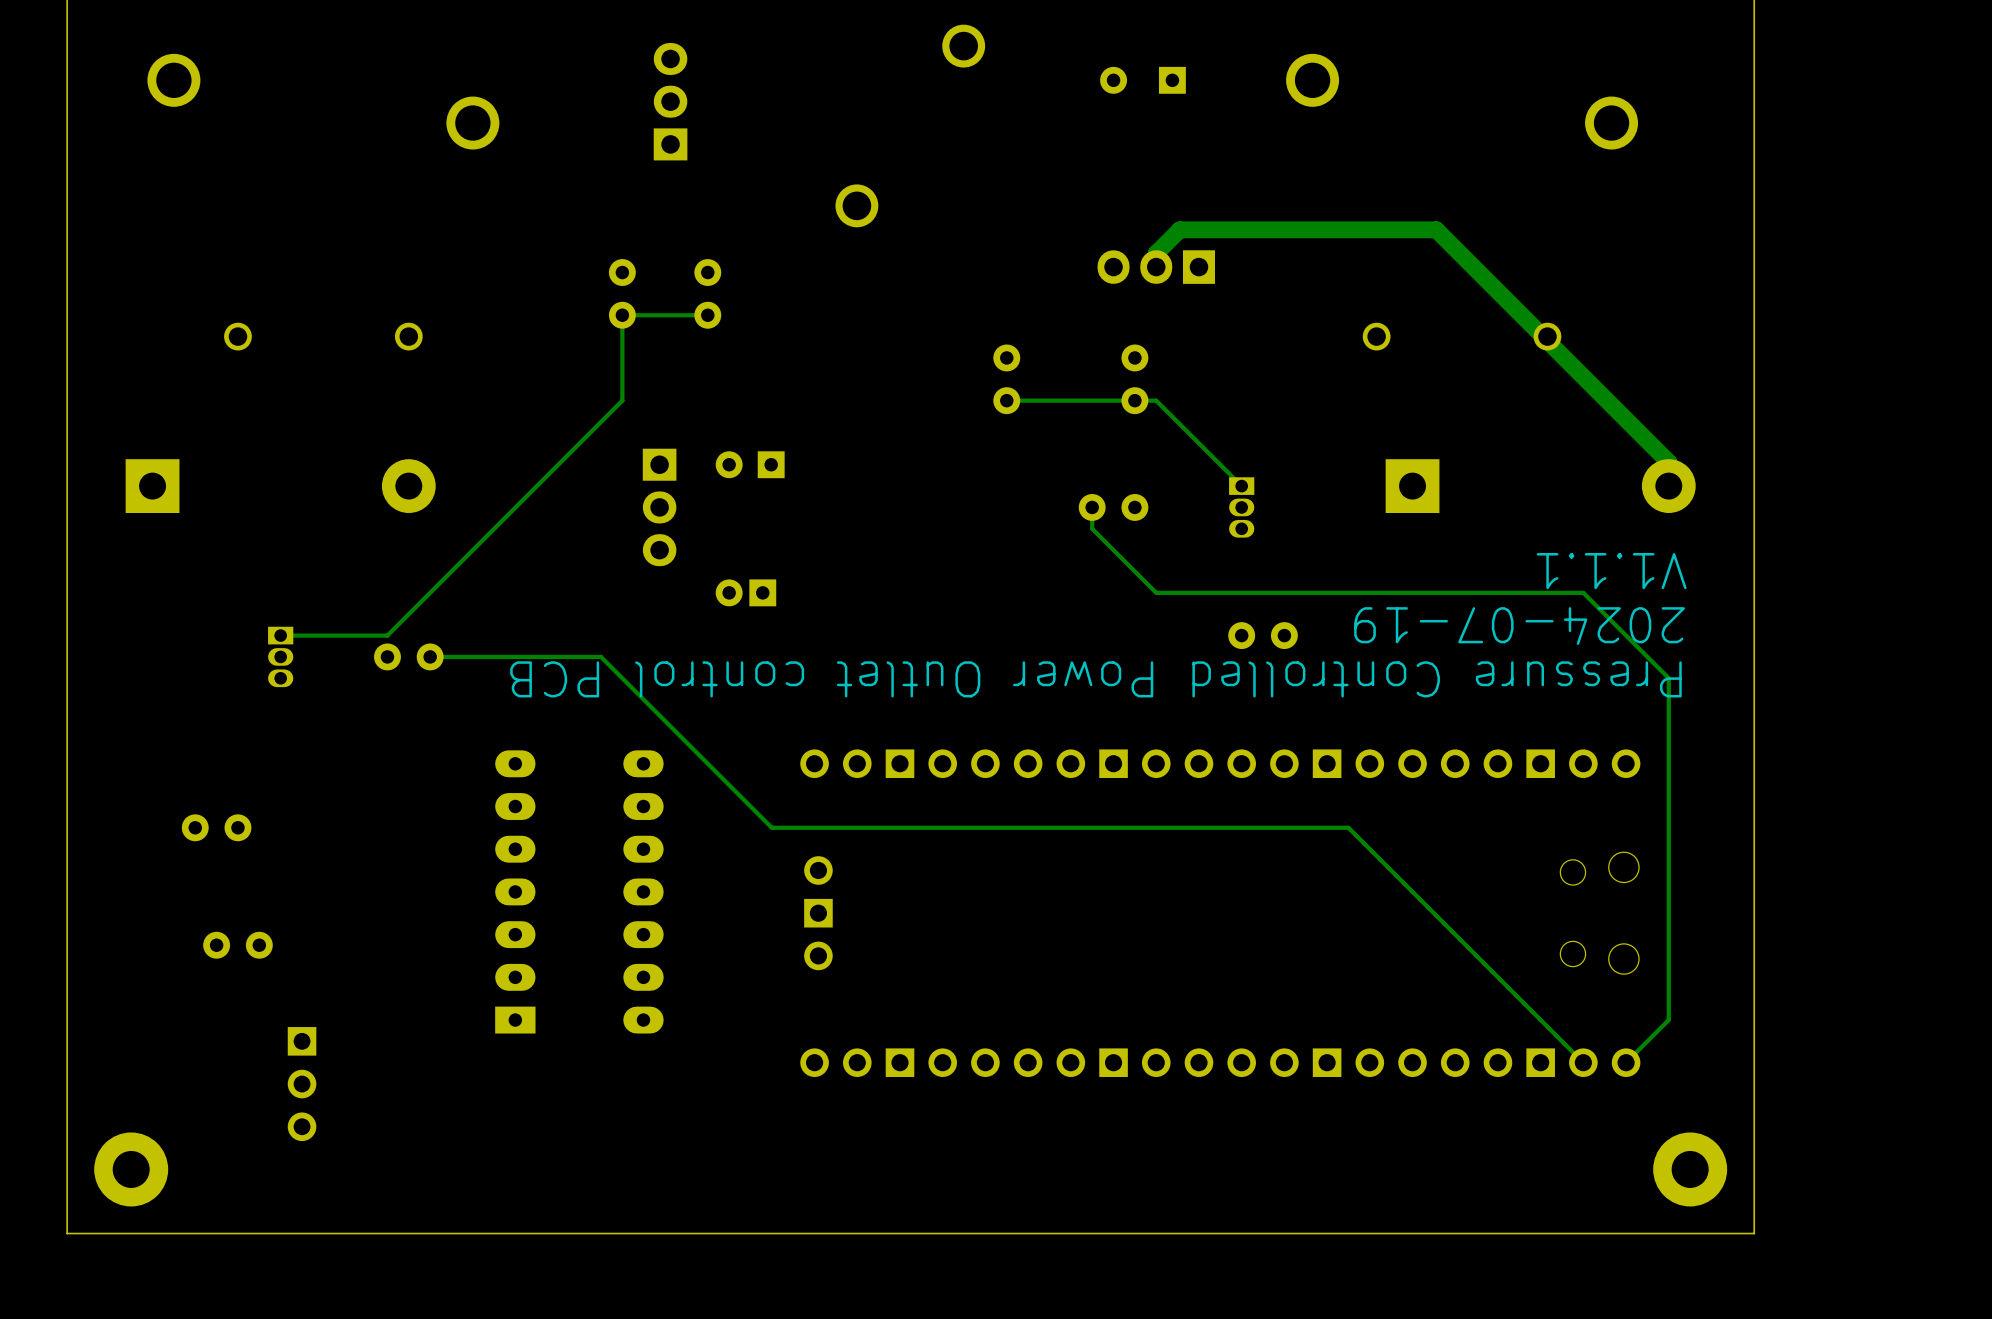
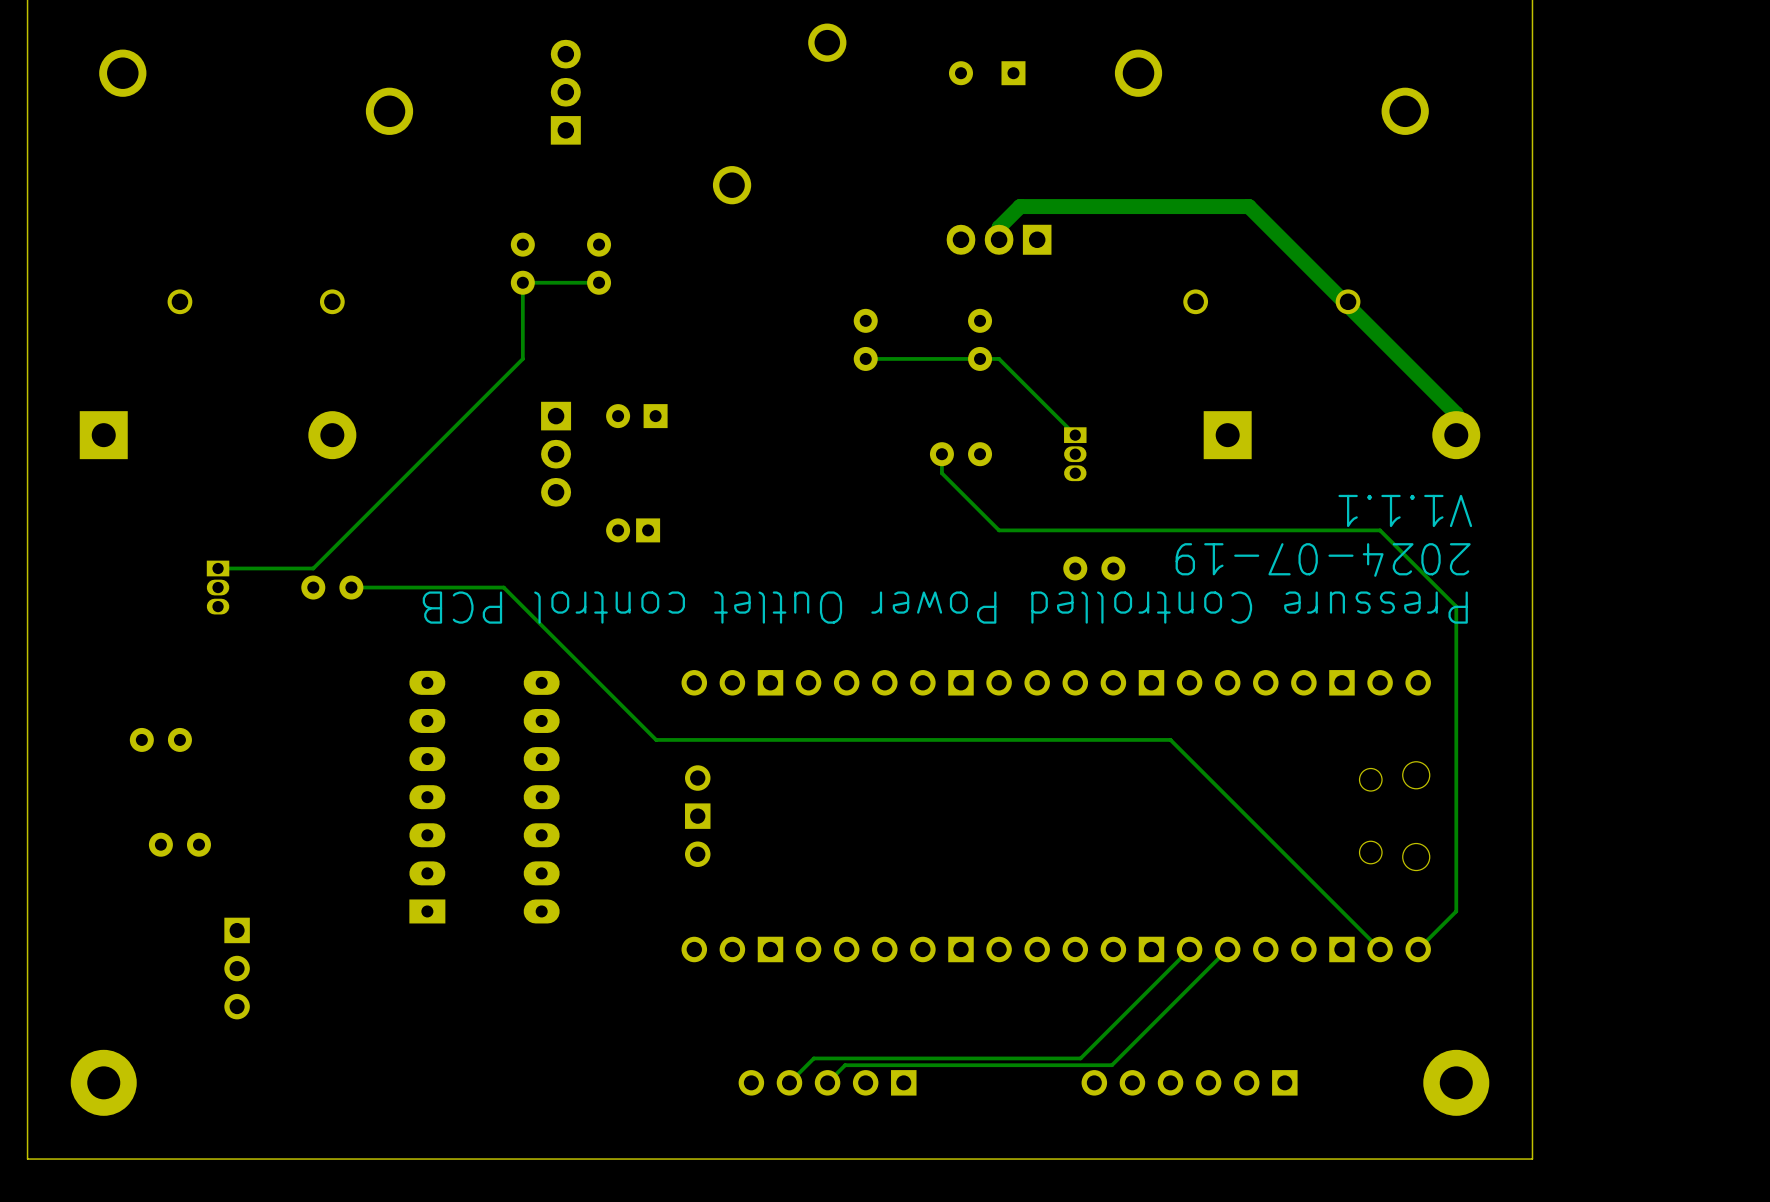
track: none -> (1189, 949) (1080, 1058) (813, 1058) (789, 1082)
track: none -> (1227, 949) (1111, 1065) (845, 1065) (827, 1082)
part position: (131, 1169) -> (103, 1082)
part position: (1690, 1169) -> (1456, 1082)
part: none -> (827, 1082)
part: none -> (1189, 1082)
board edge: (1754, 1233) (67, 1233) -> (1532, 1101) (1532, 1159) (27, 1159) (27, 1101)

